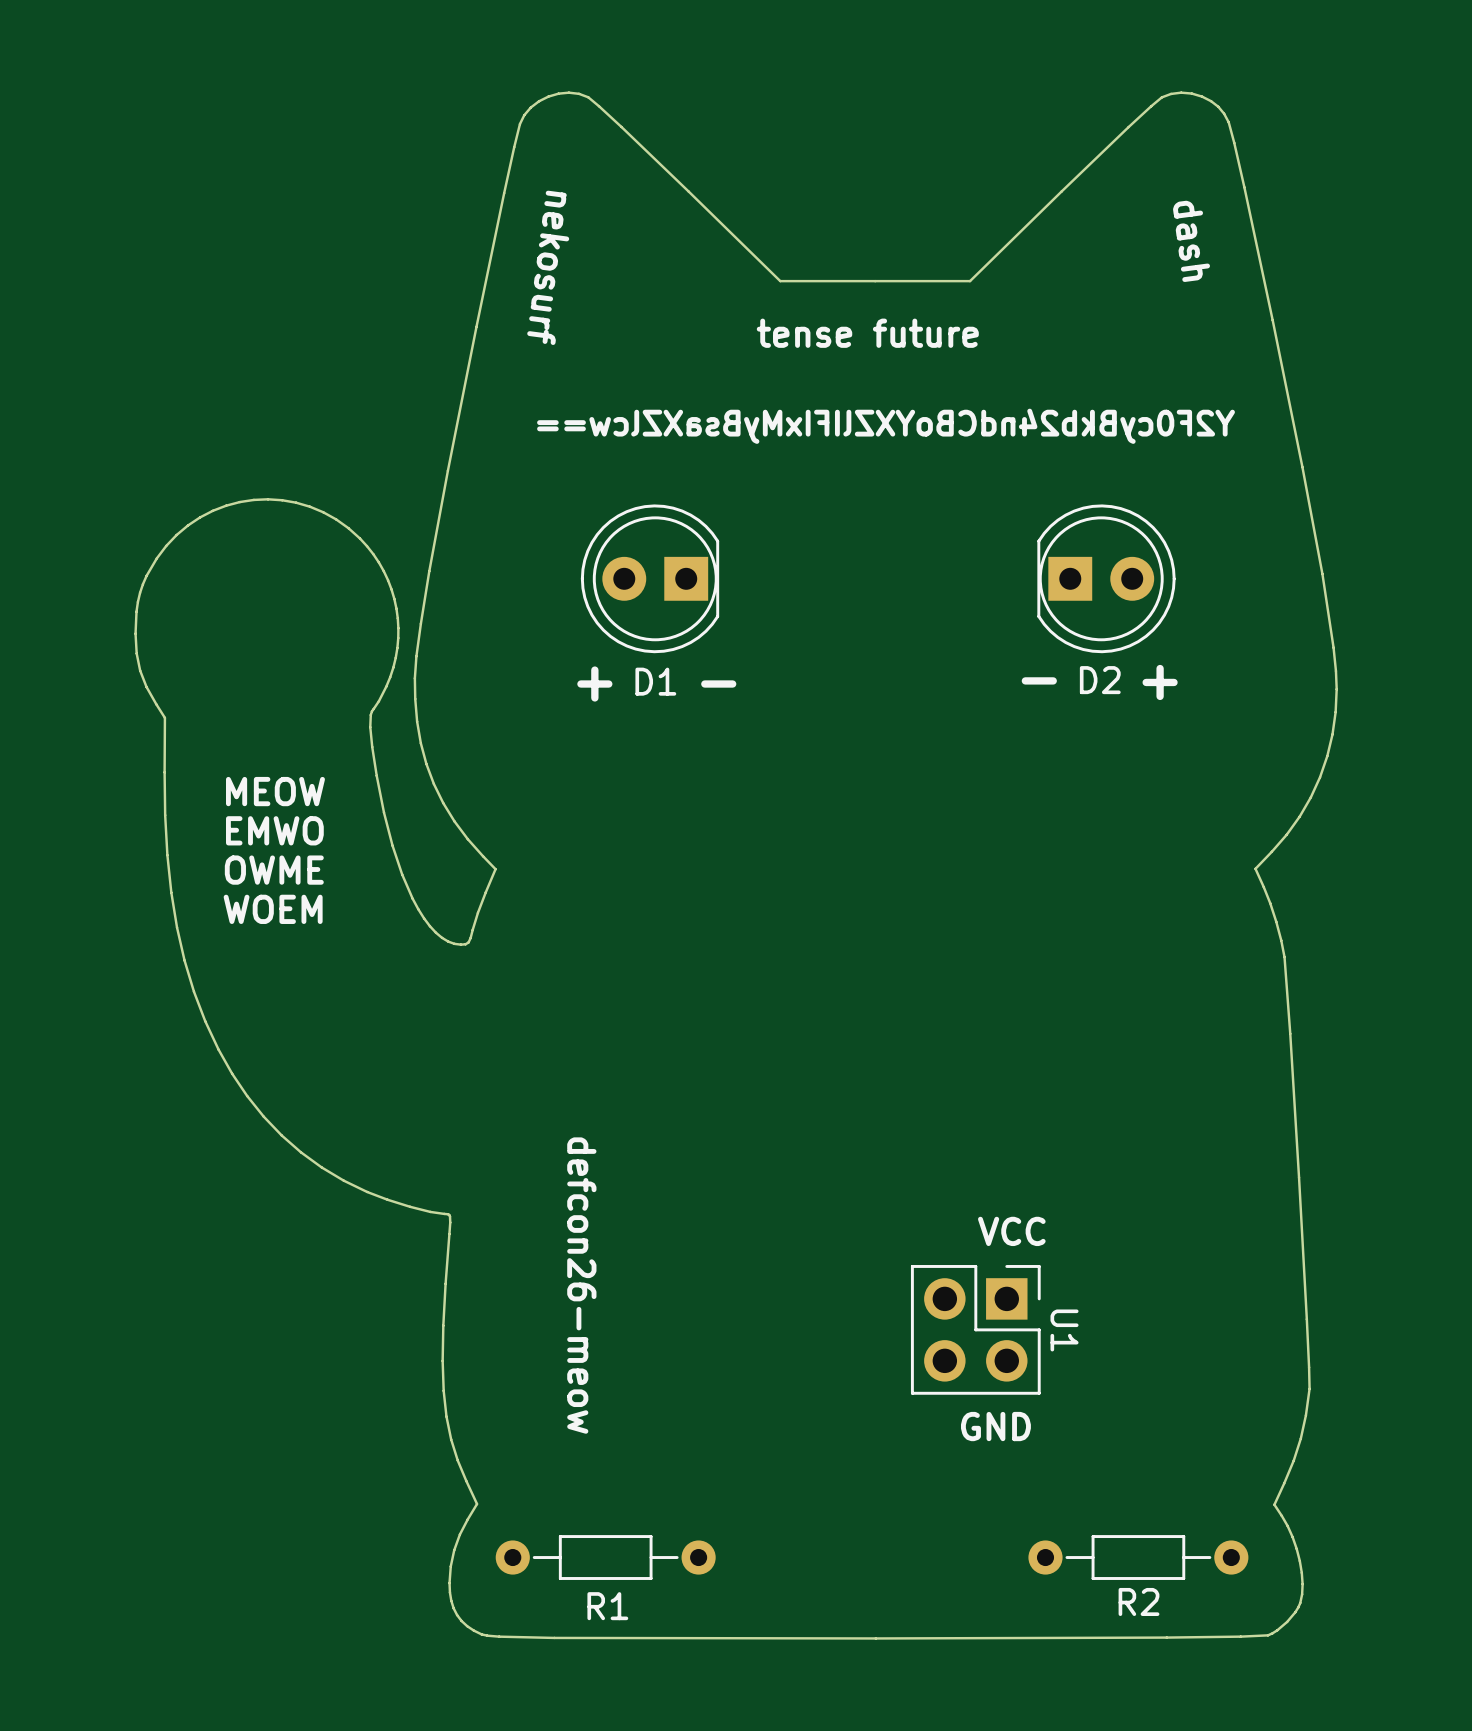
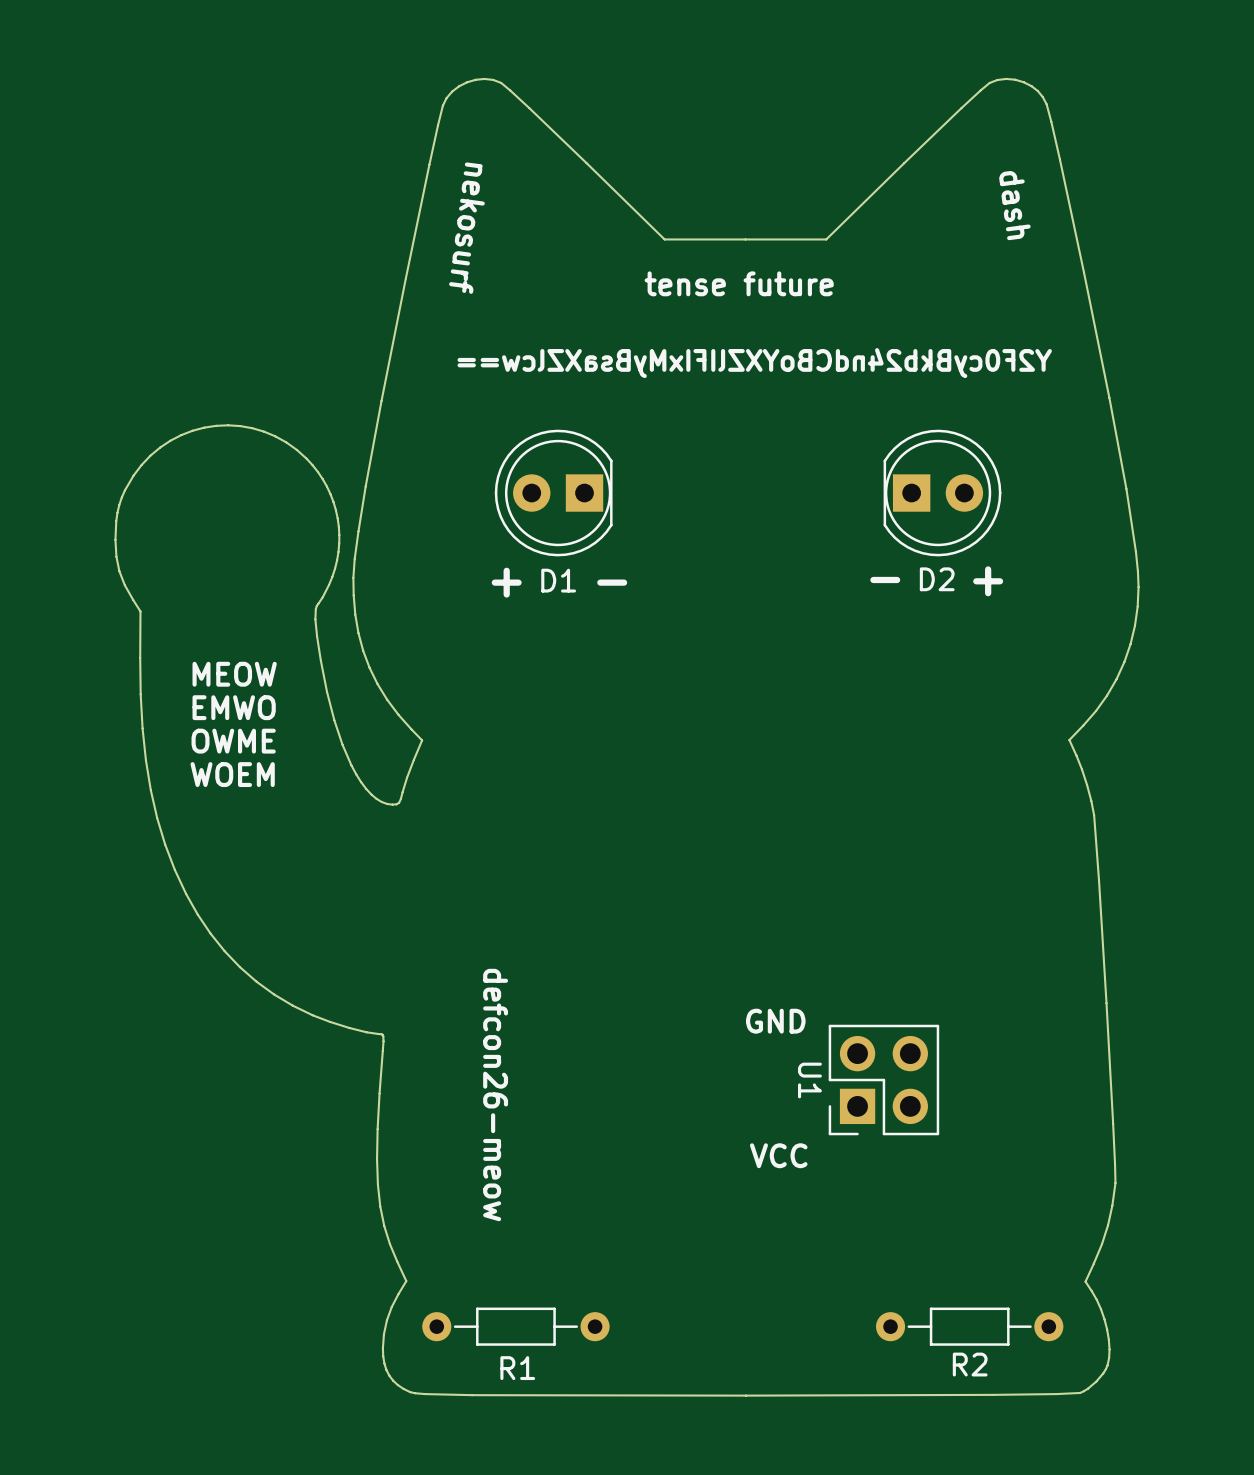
text position: VCC (1011, 1231) -> VCC (778, 1155)
U1 rotation: 0° (975, 1329) -> 180° (883, 1080)
U1 position: (975, 1329) -> (883, 1080)
text position: GND (995, 1426) -> GND (775, 1021)

